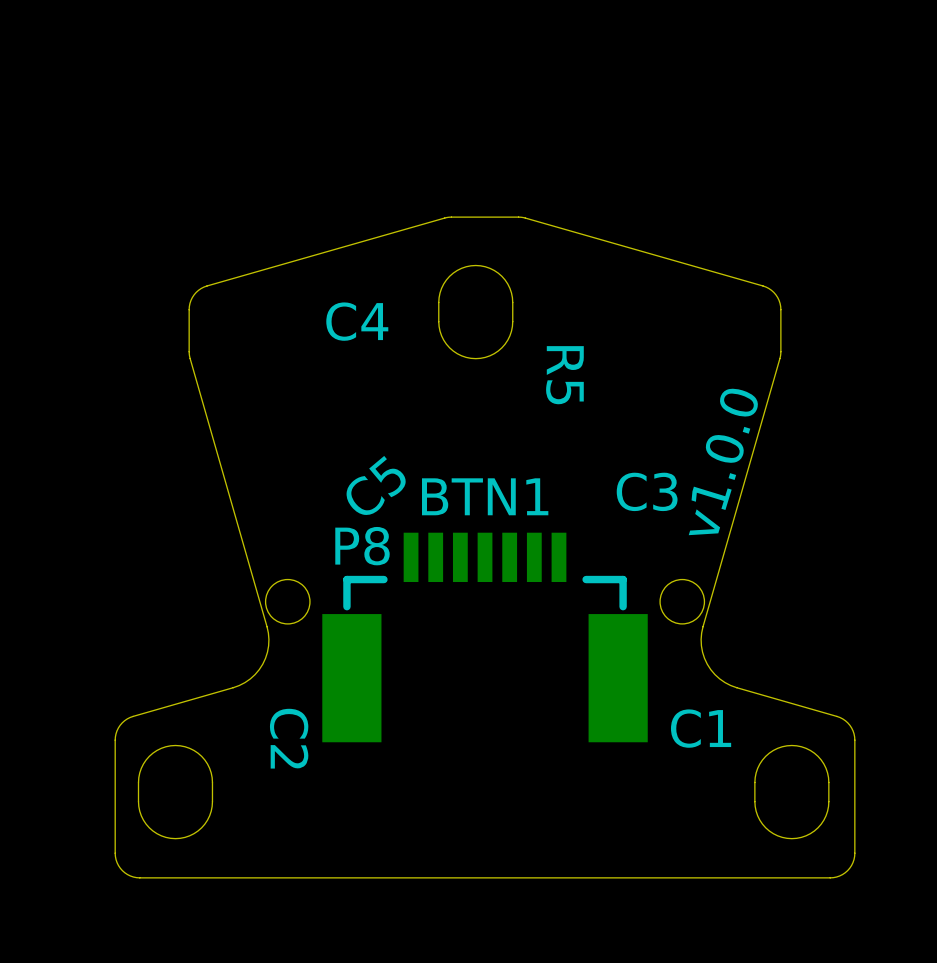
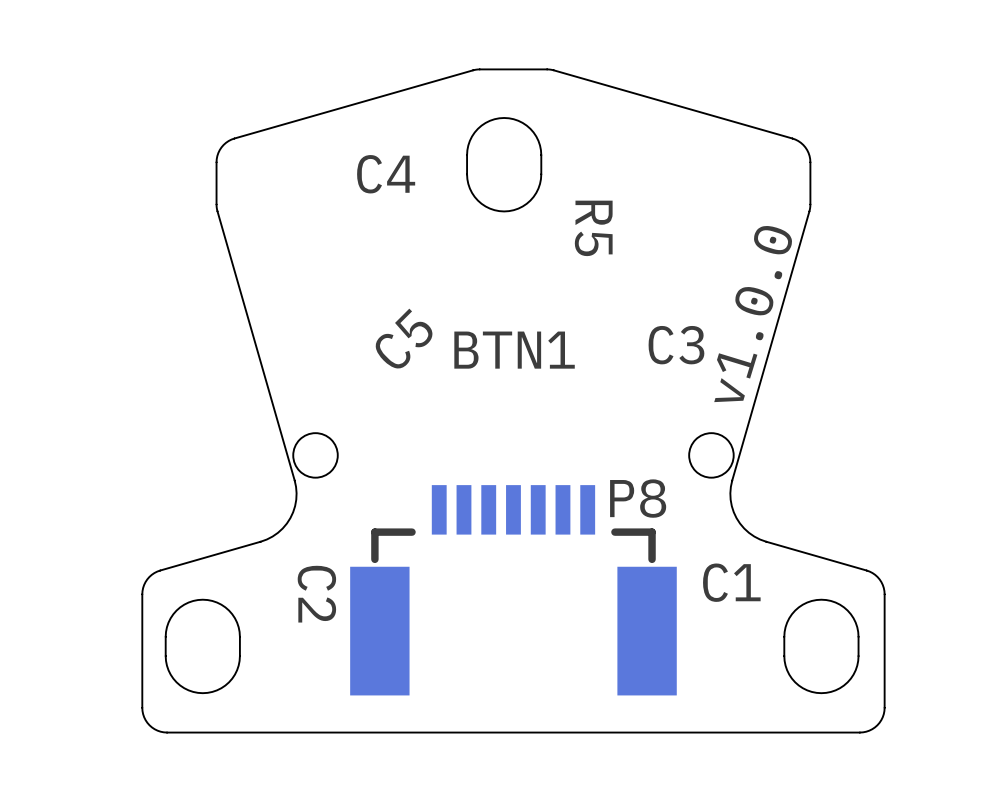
C5 name rotation: 0° (376, 485) -> 5° counterclockwise (403, 339)
P8 name position: P8 (362, 546) -> P8 (638, 498)
P8 position: (485, 637) -> (513, 590)

